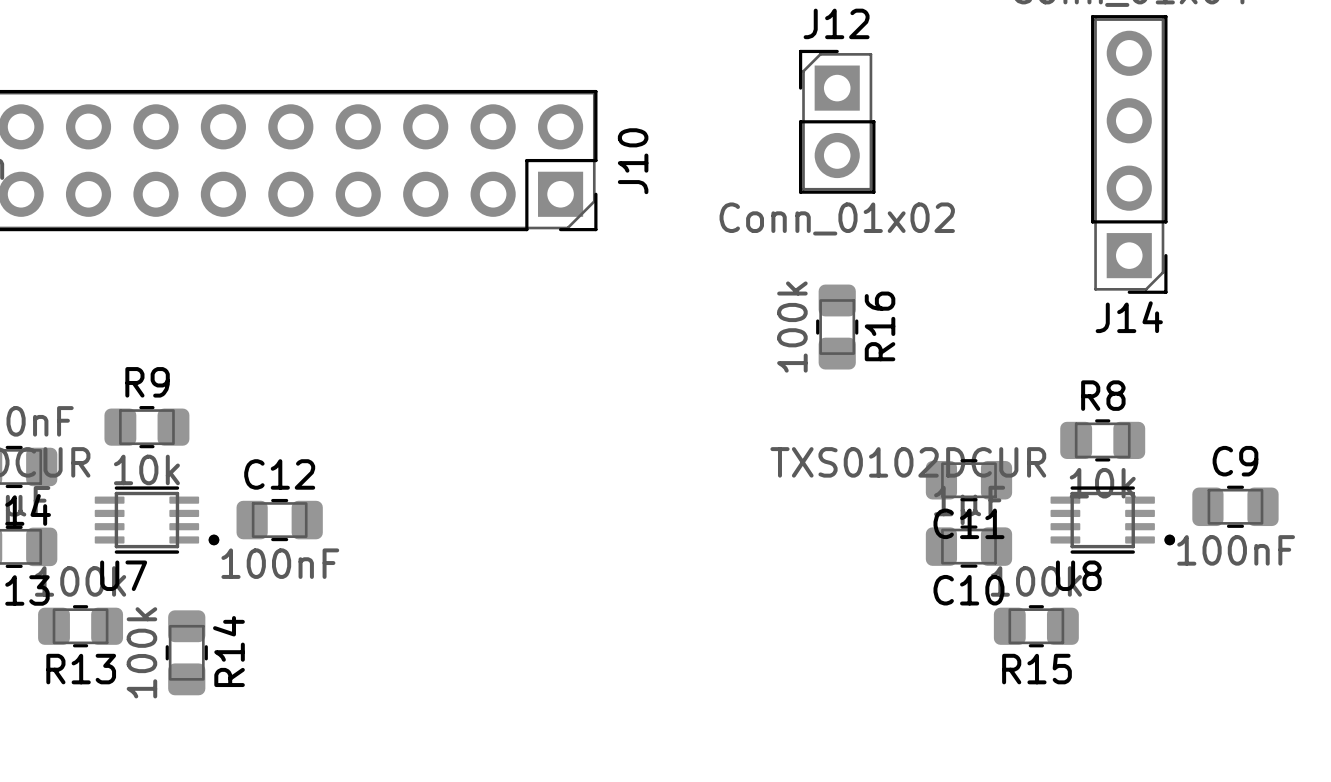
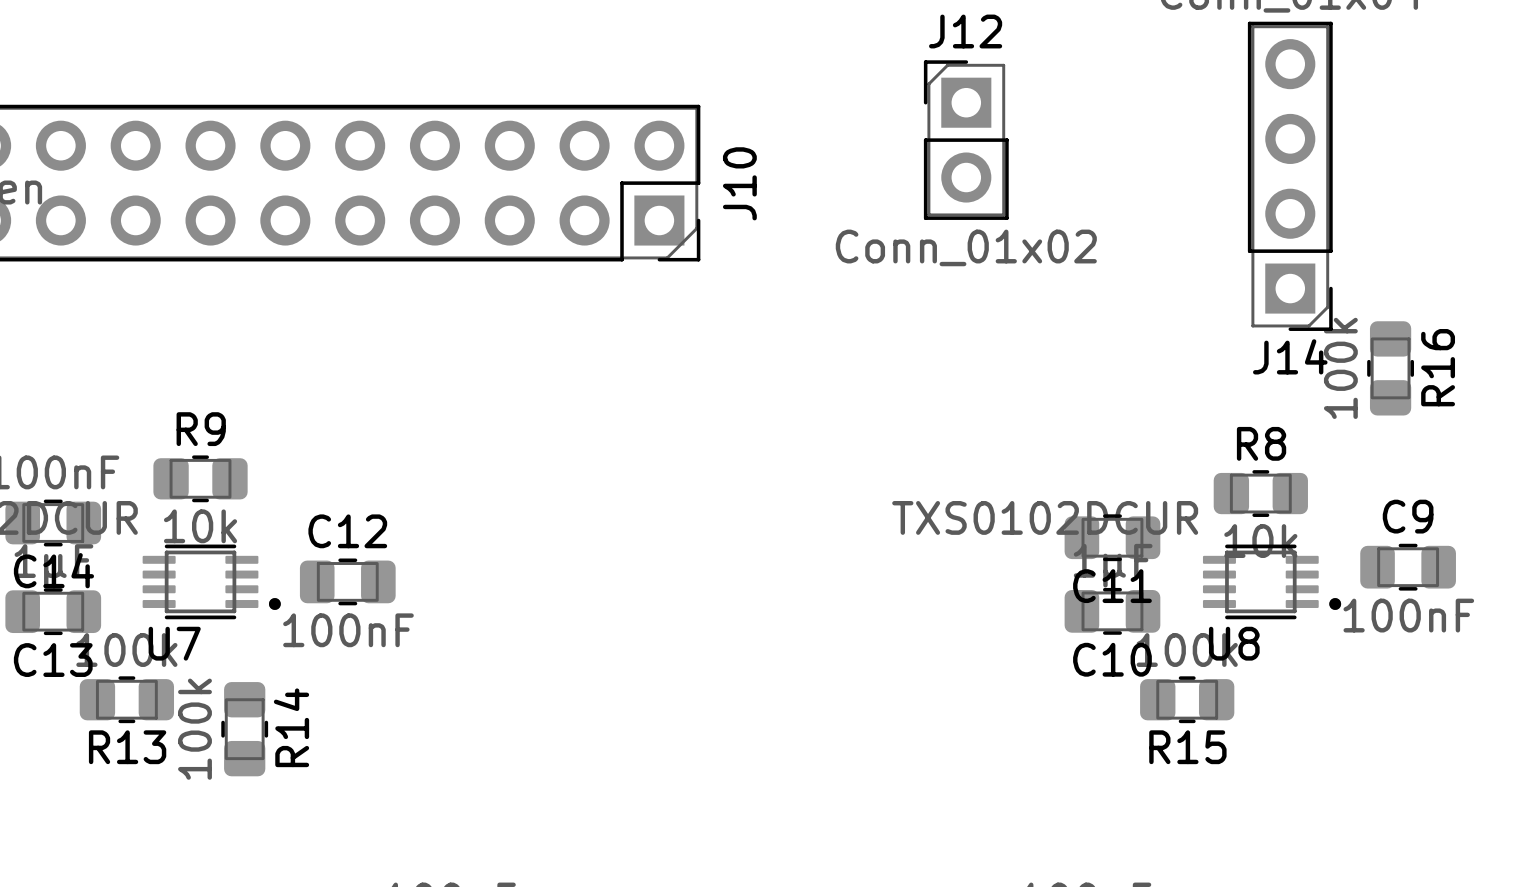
R16 position: (837, 327) -> (1390, 368)

